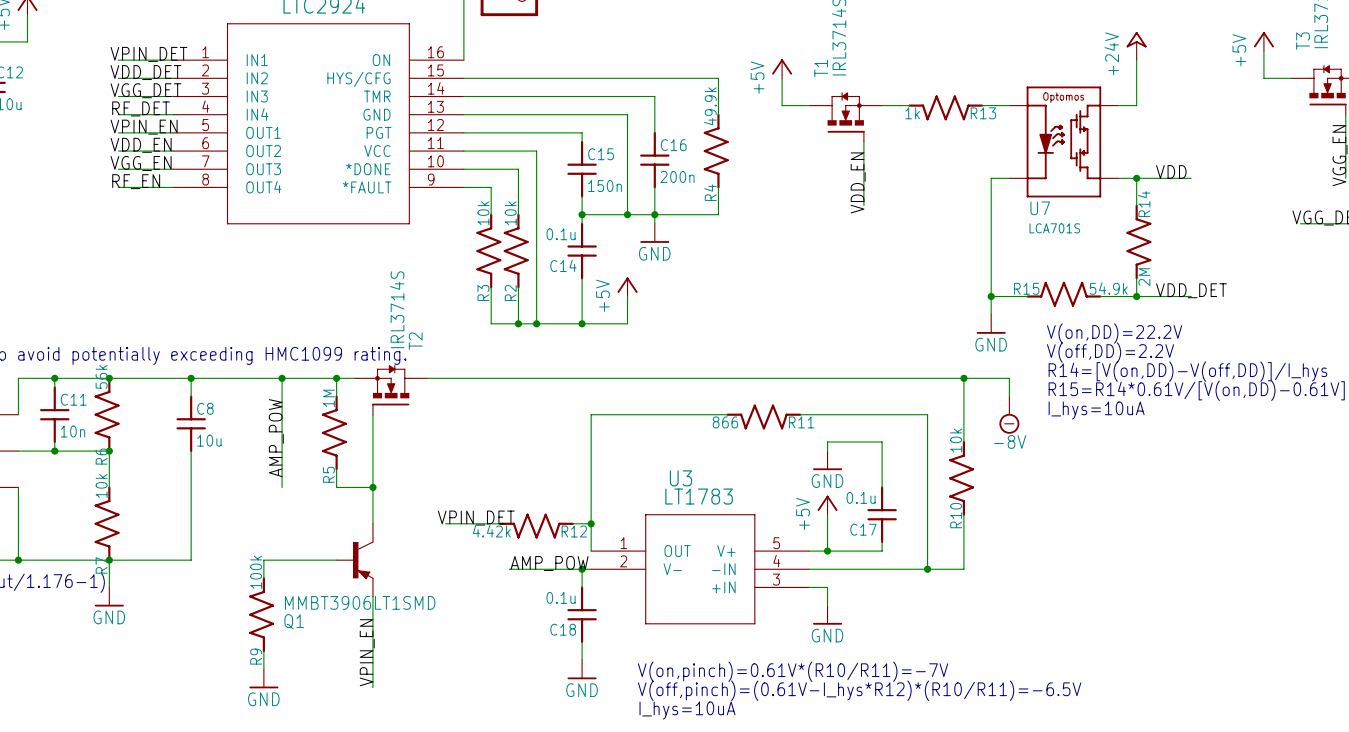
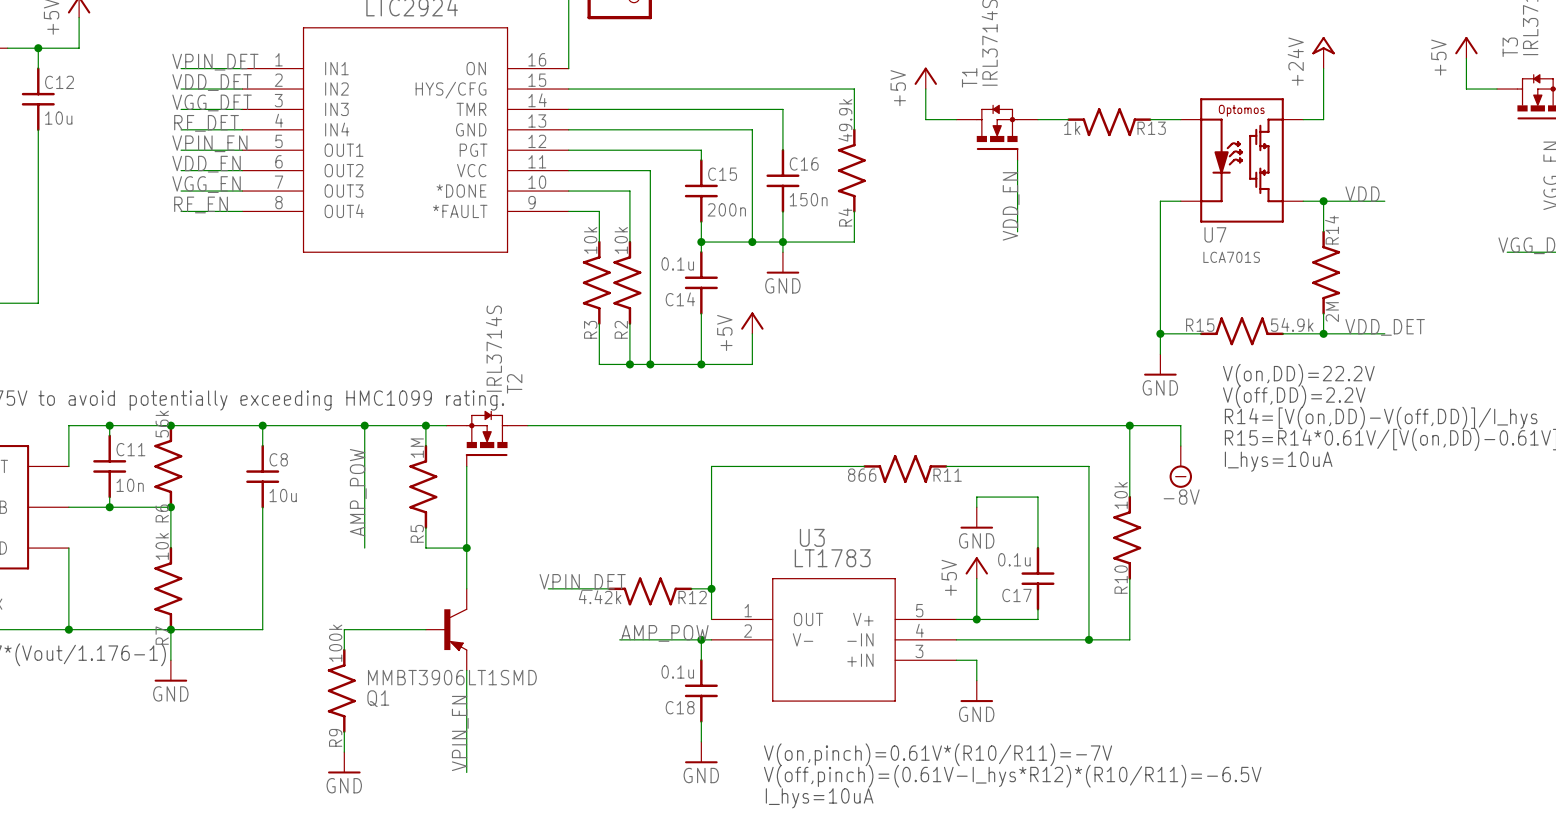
C16 value: 200n (677, 176) -> 150n (808, 199)
C15 value: 150n (604, 186) -> 200n (726, 209)

